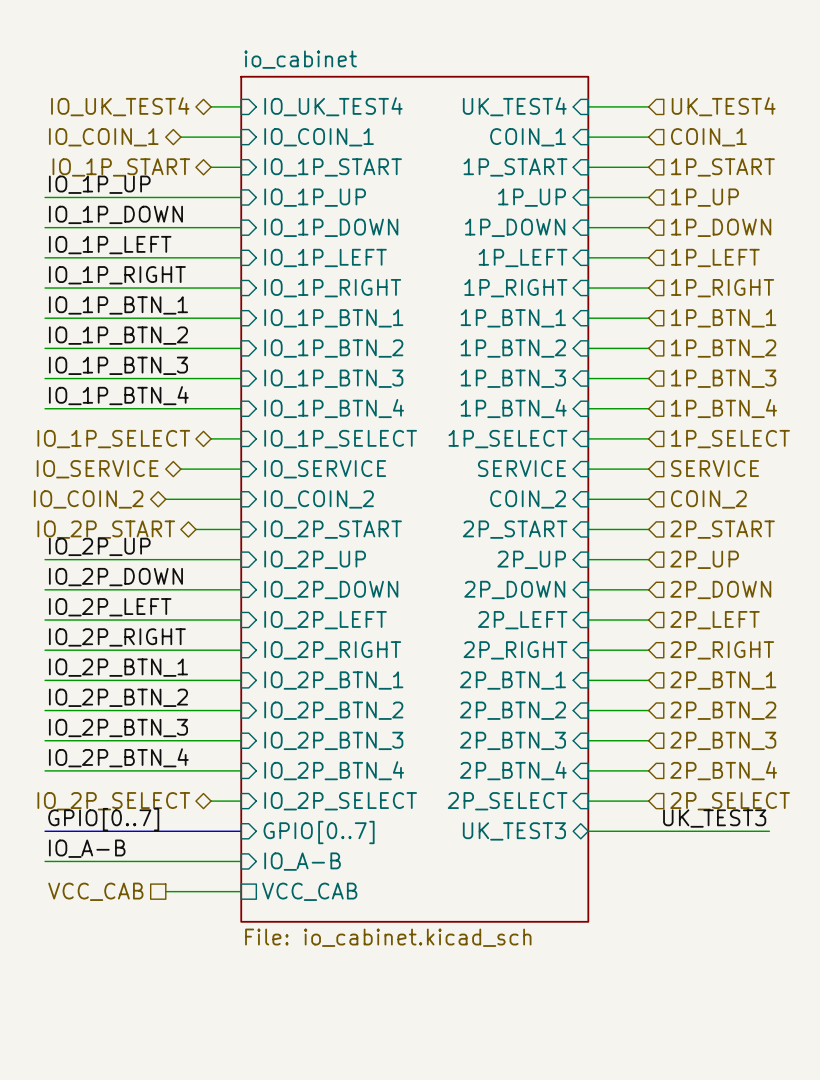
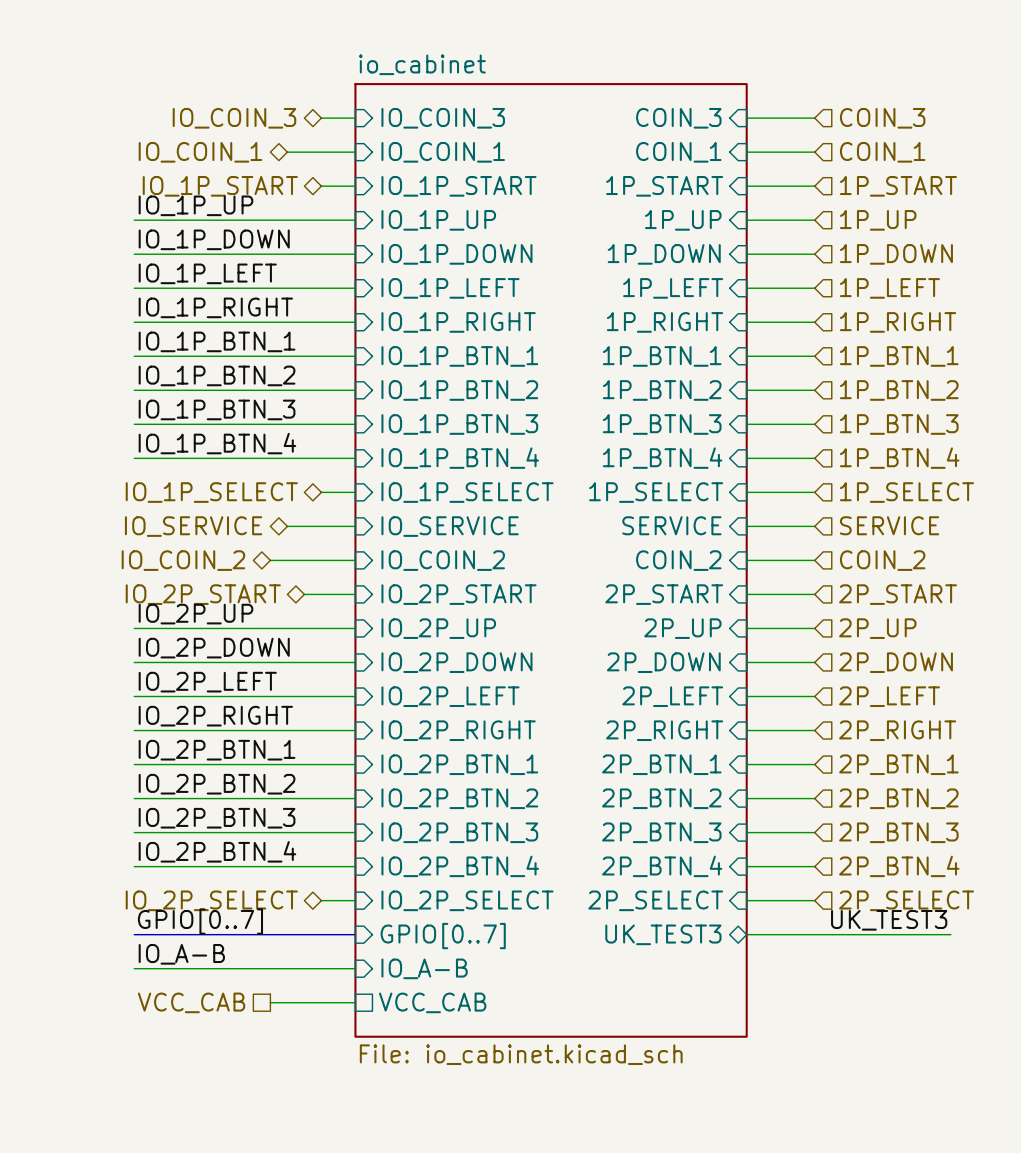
hierarchical label: IO_UK_TEST4 (120, 106) -> IO_COIN_3 (234, 118)
sheet pin: IO_UK_TEST4 (333, 106) -> IO_COIN_3 (443, 118)
sheet pin: UK_TEST4 (514, 106) -> COIN_3 (678, 118)
hierarchical label: UK_TEST4 (723, 106) -> COIN_3 (882, 118)

